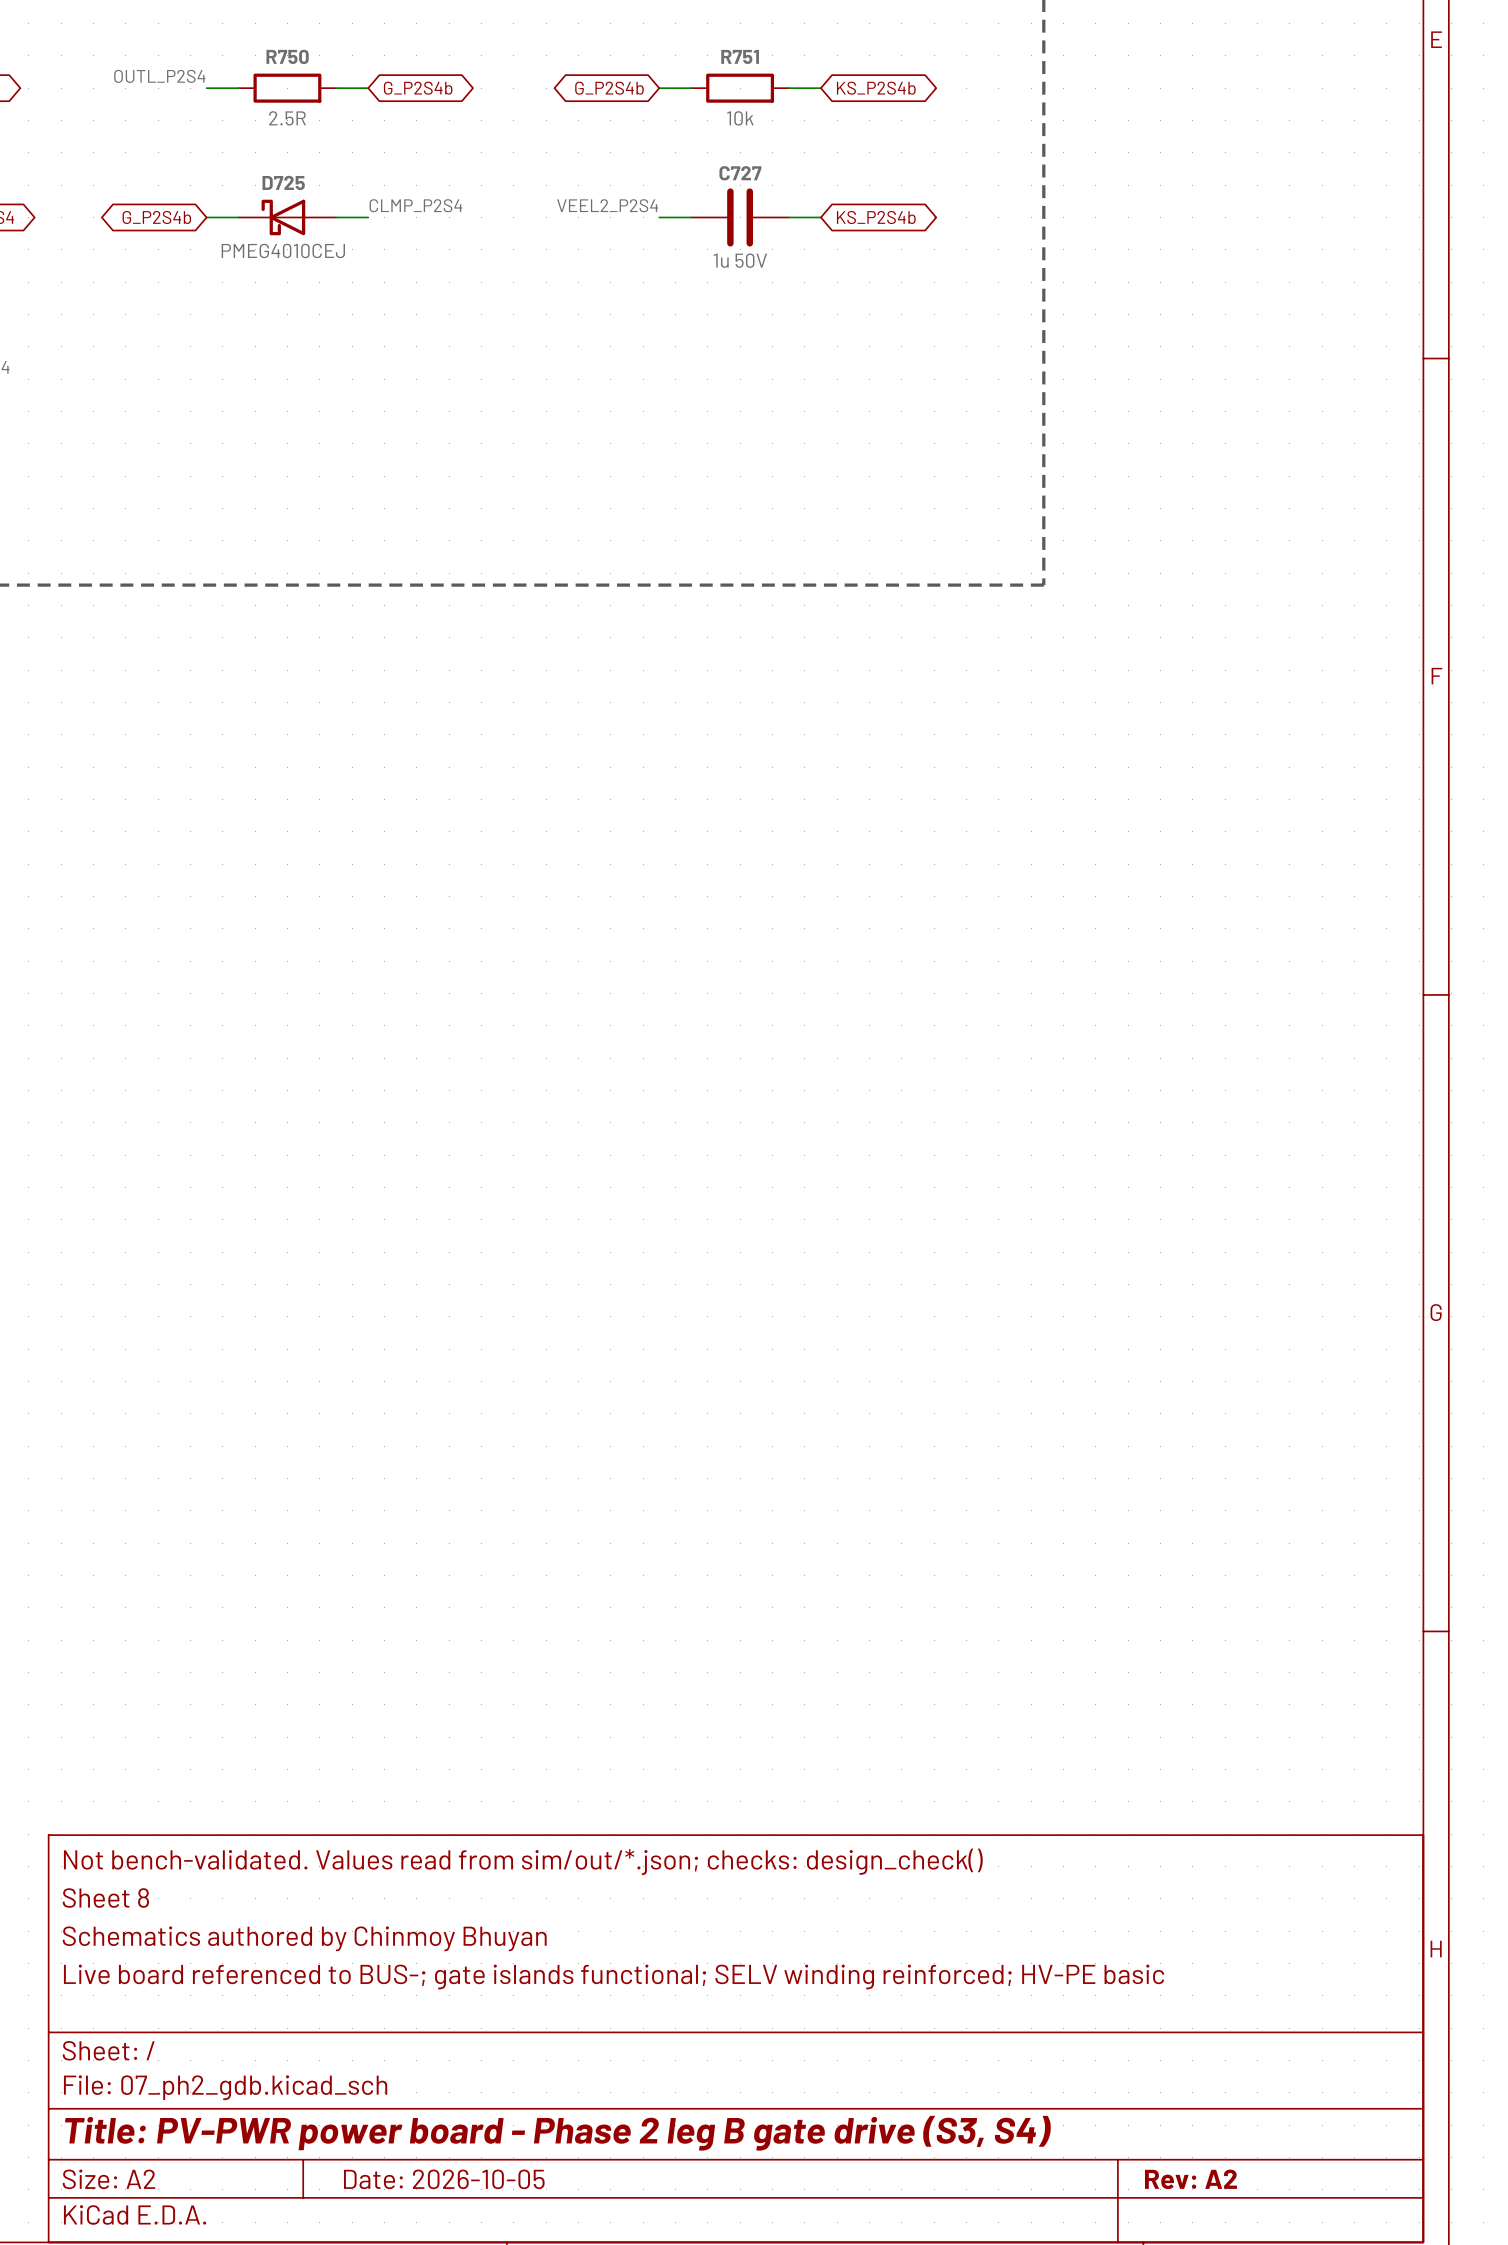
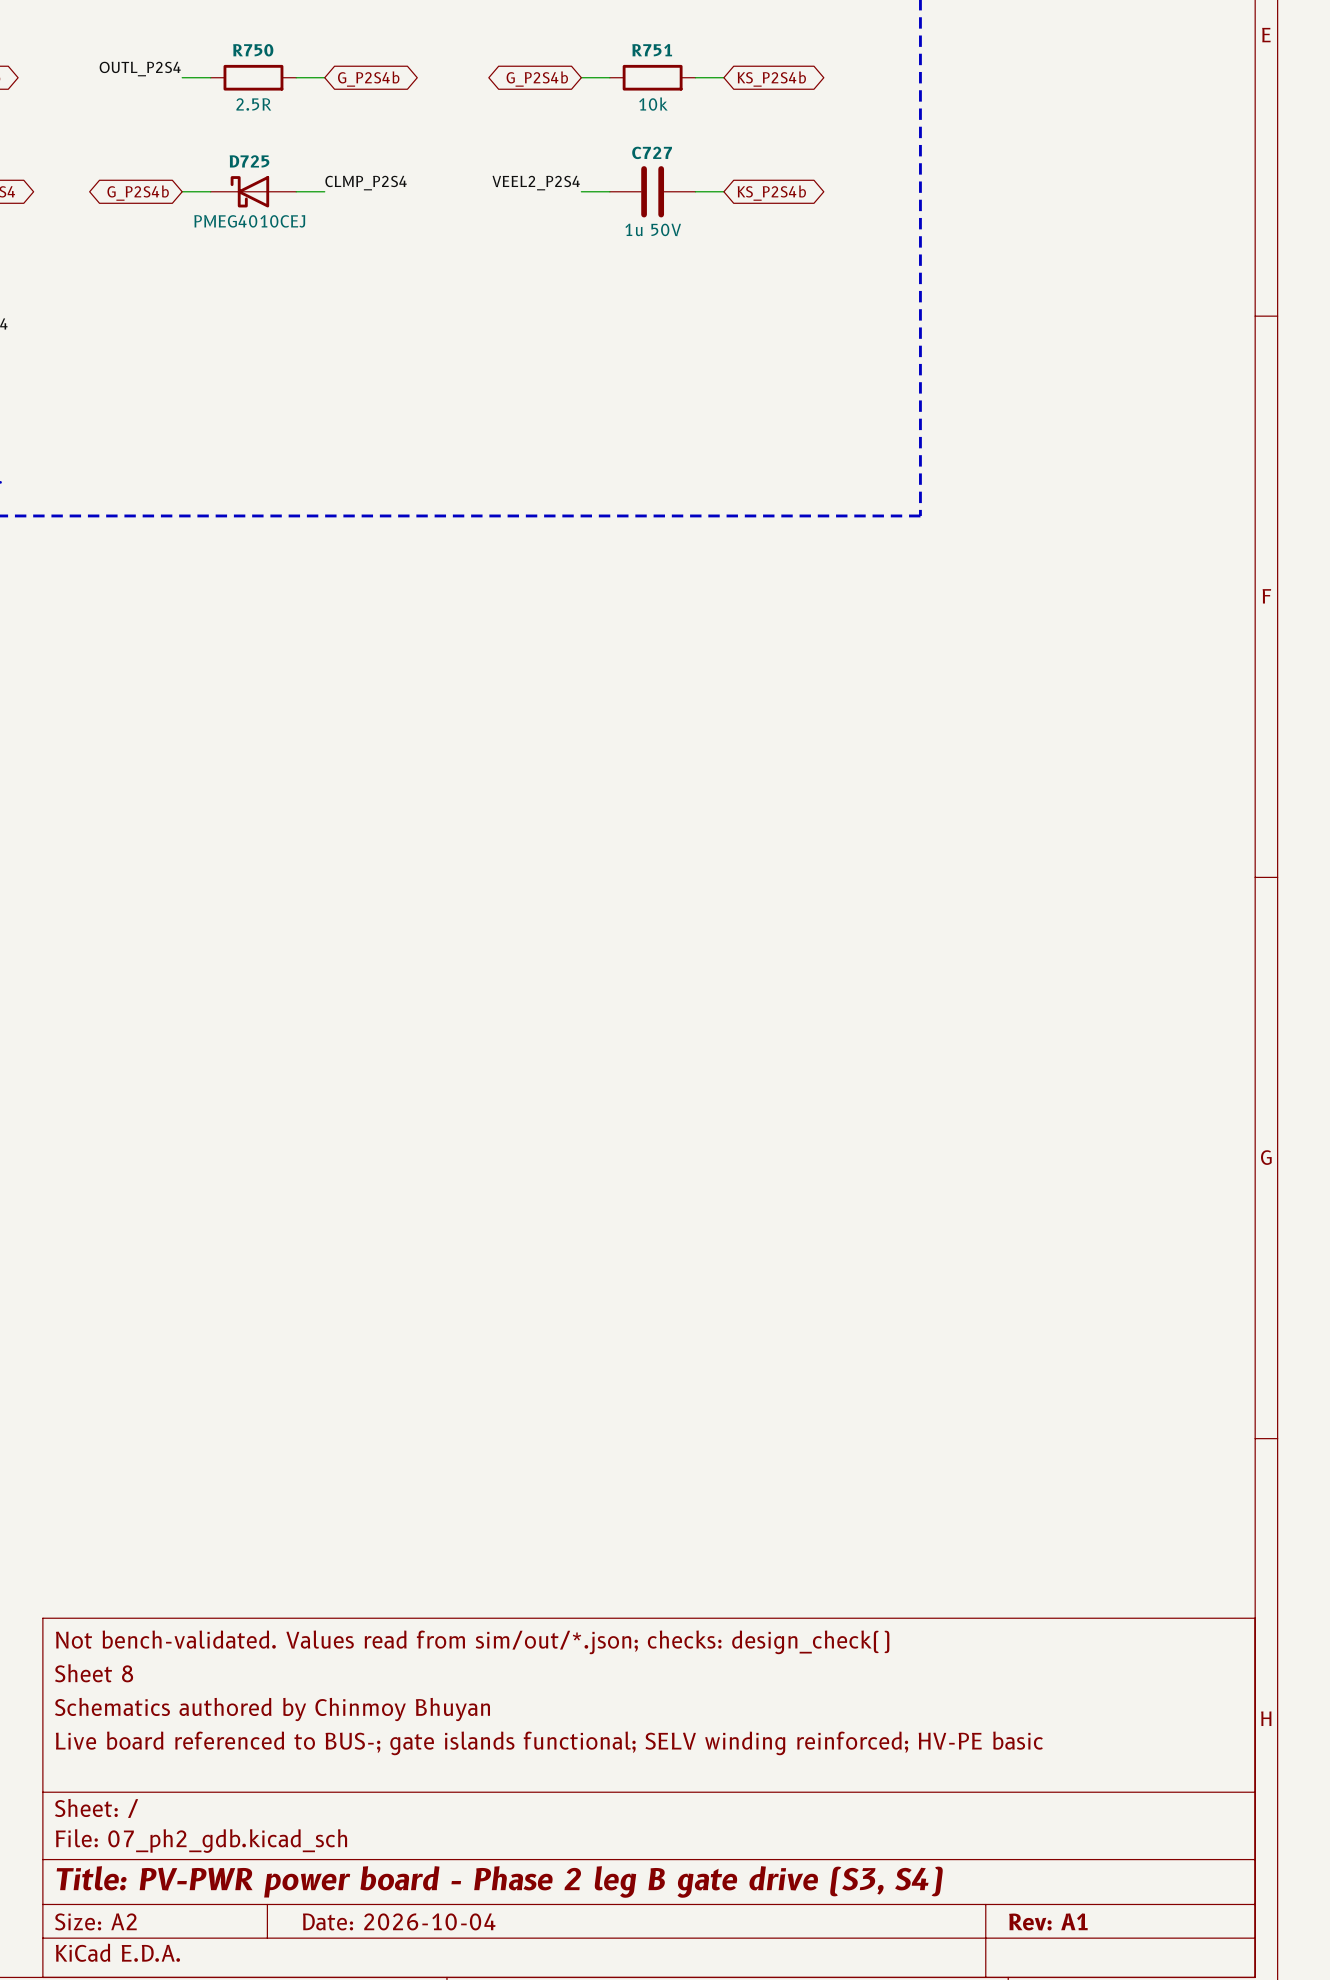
title block: Date: 2026-10-05 (444, 2179) -> Date: 2026-10-04 (399, 1921)
title block: Rev: A2 (1191, 2179) -> Rev: A1 (1048, 1921)

